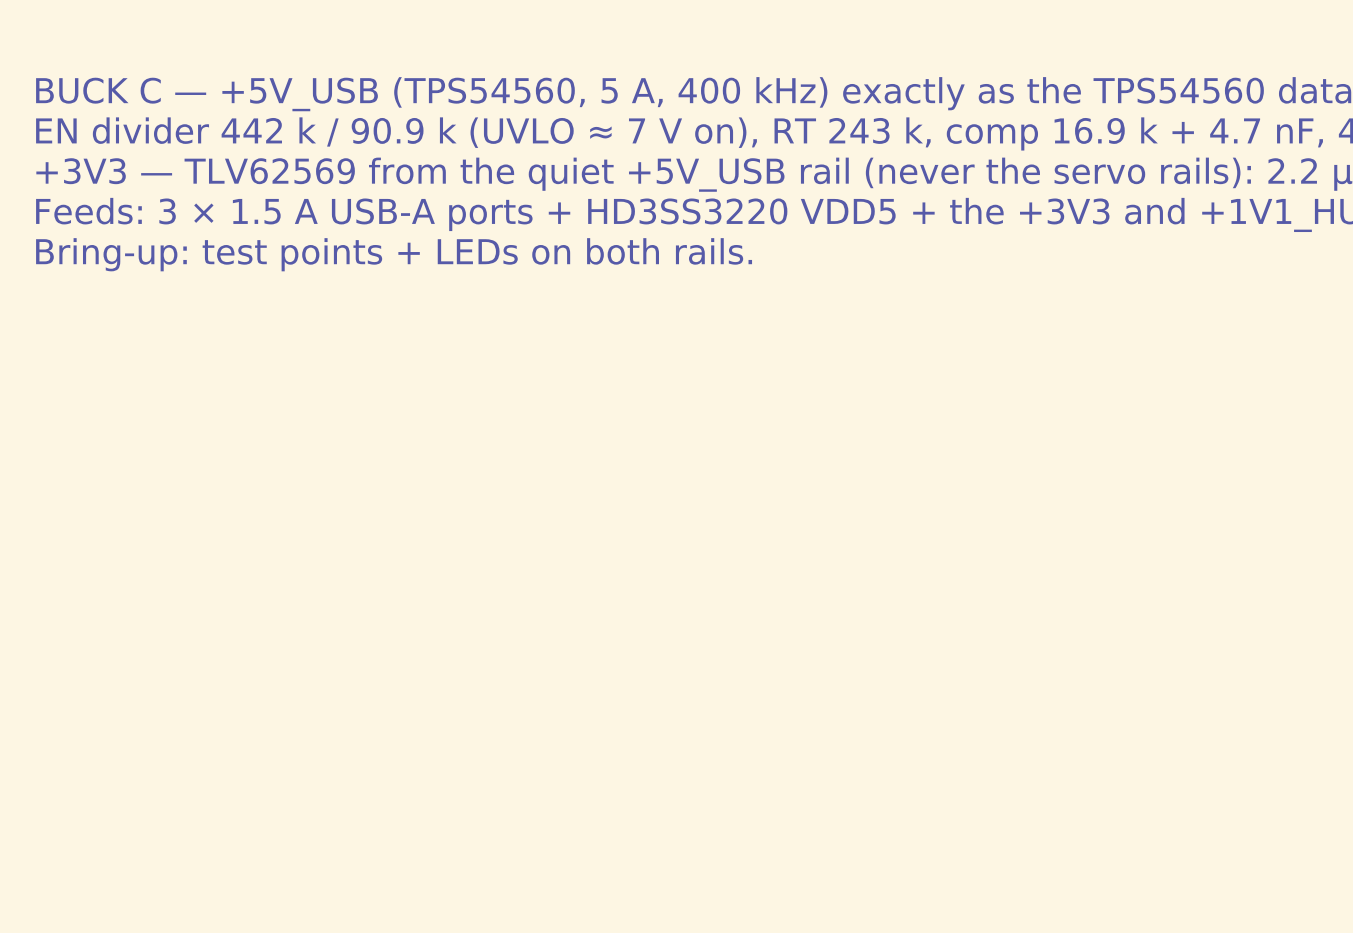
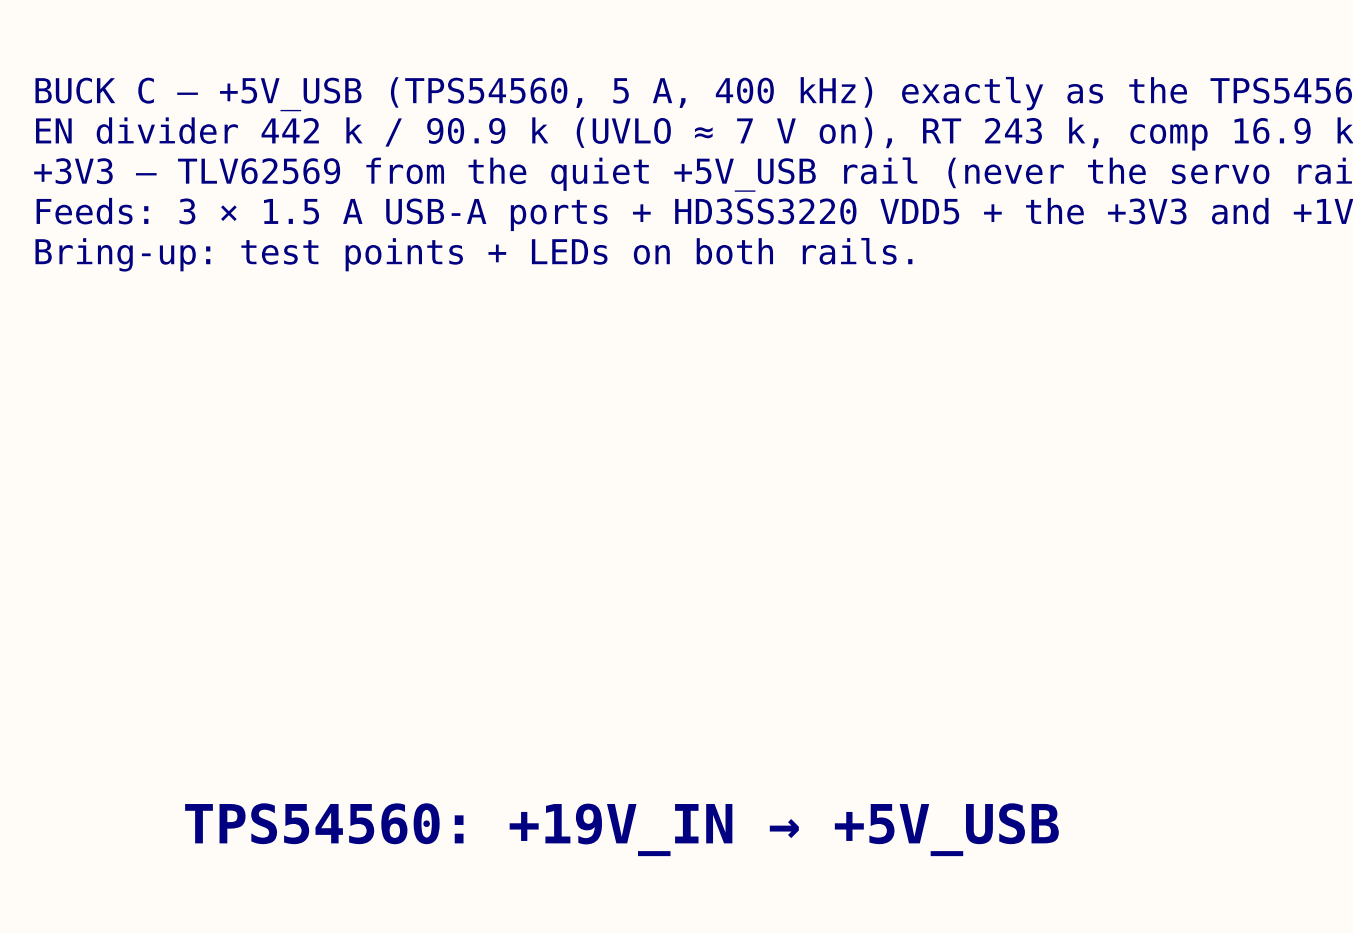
text: none -> TPS54560: +19V_IN → +5V_USB (621, 829)

